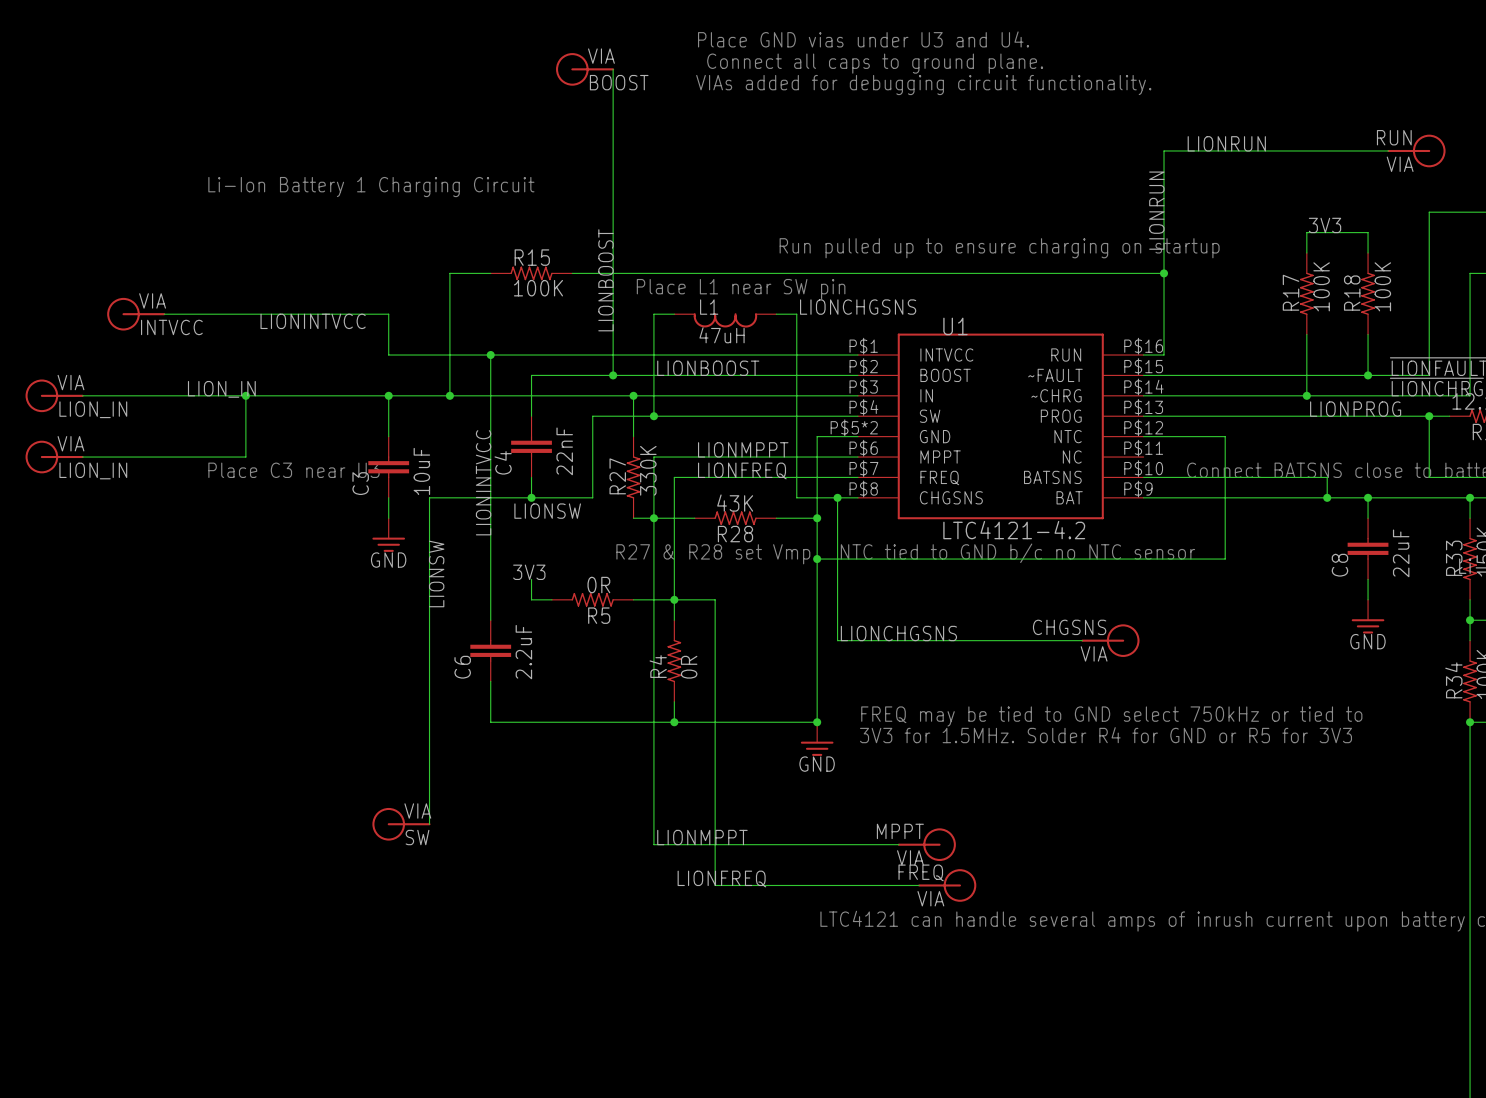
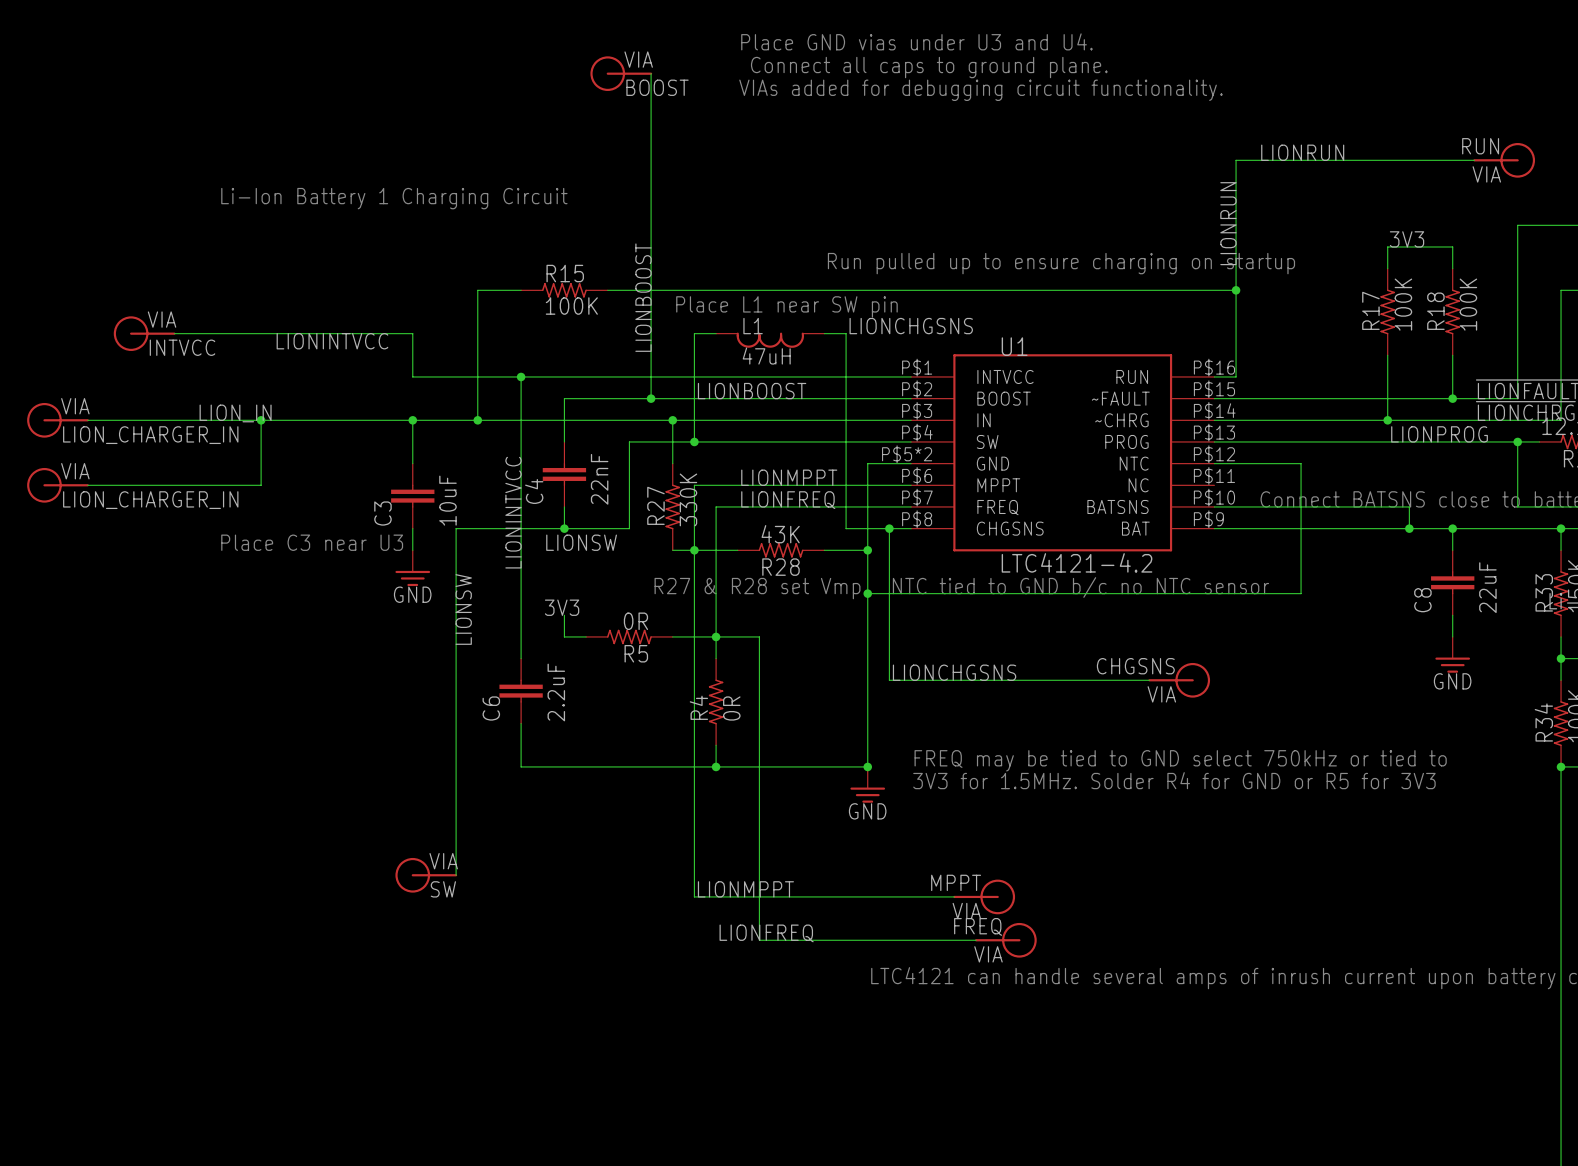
part value: LION_IN (93, 409) -> LION_CHARGER_IN (150, 435)
part value: LION_IN (93, 470) -> LION_CHARGER_IN (150, 500)
text position: Place C3 near U3 (293, 470) -> Place C3 near U3 (312, 542)

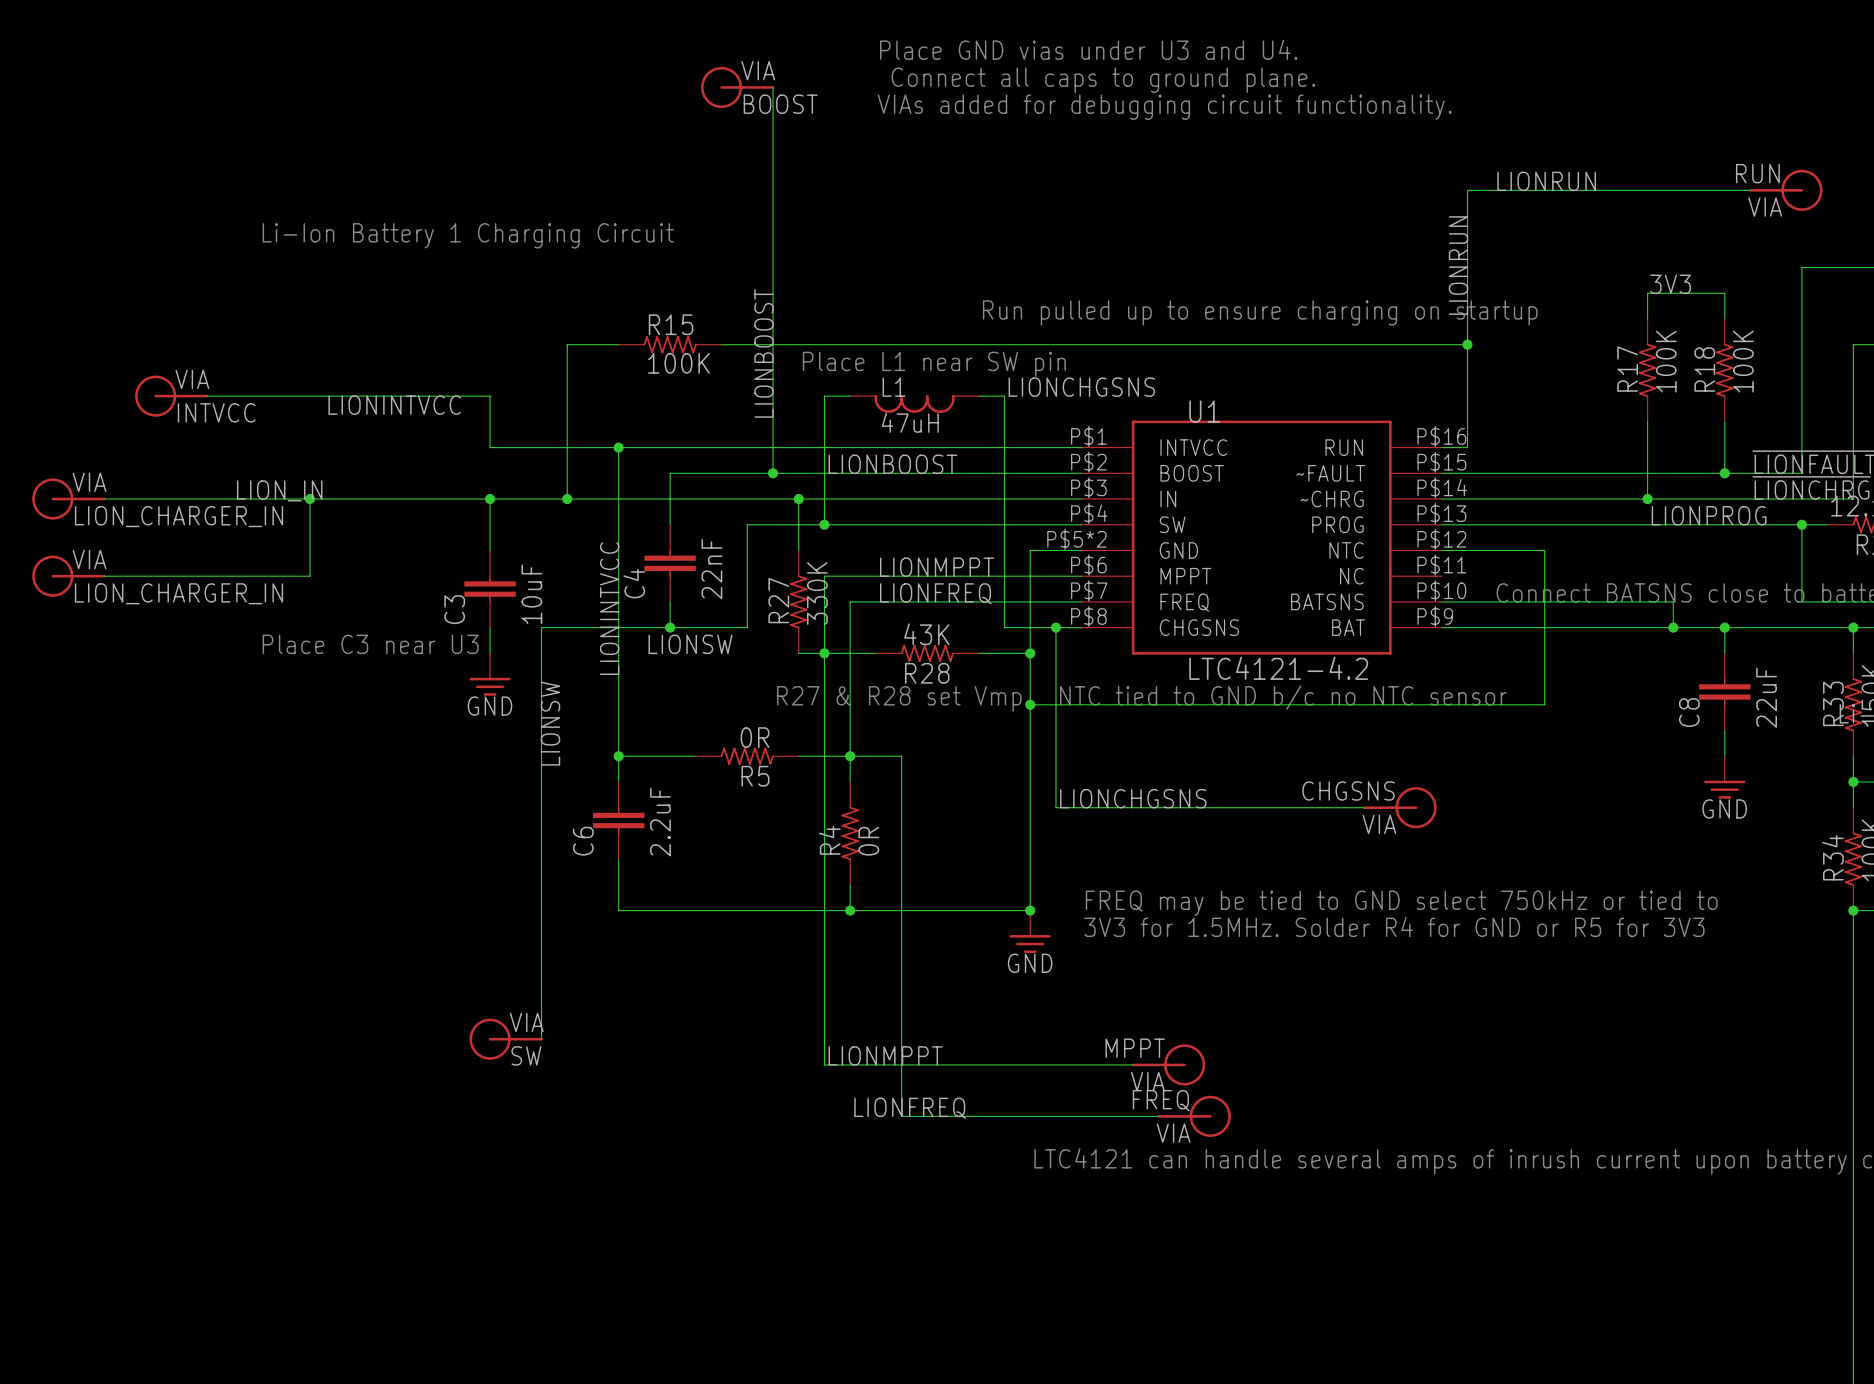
label: 3V3 (562, 607) -> none
wire: (564, 615) (564, 636) -> (618, 756) (670, 756)
junction: none -> (618, 756)

